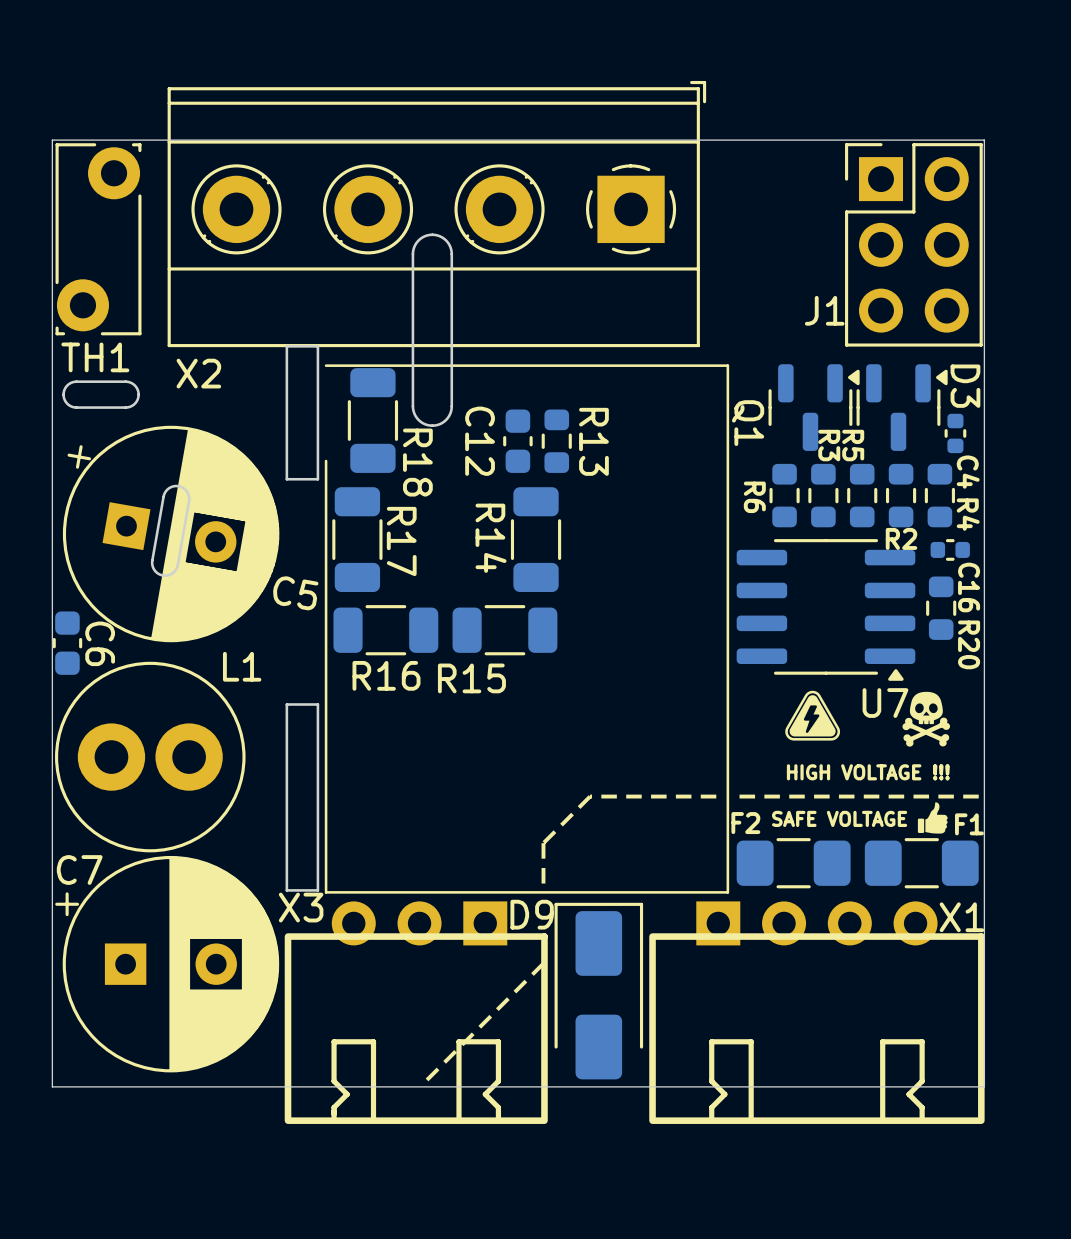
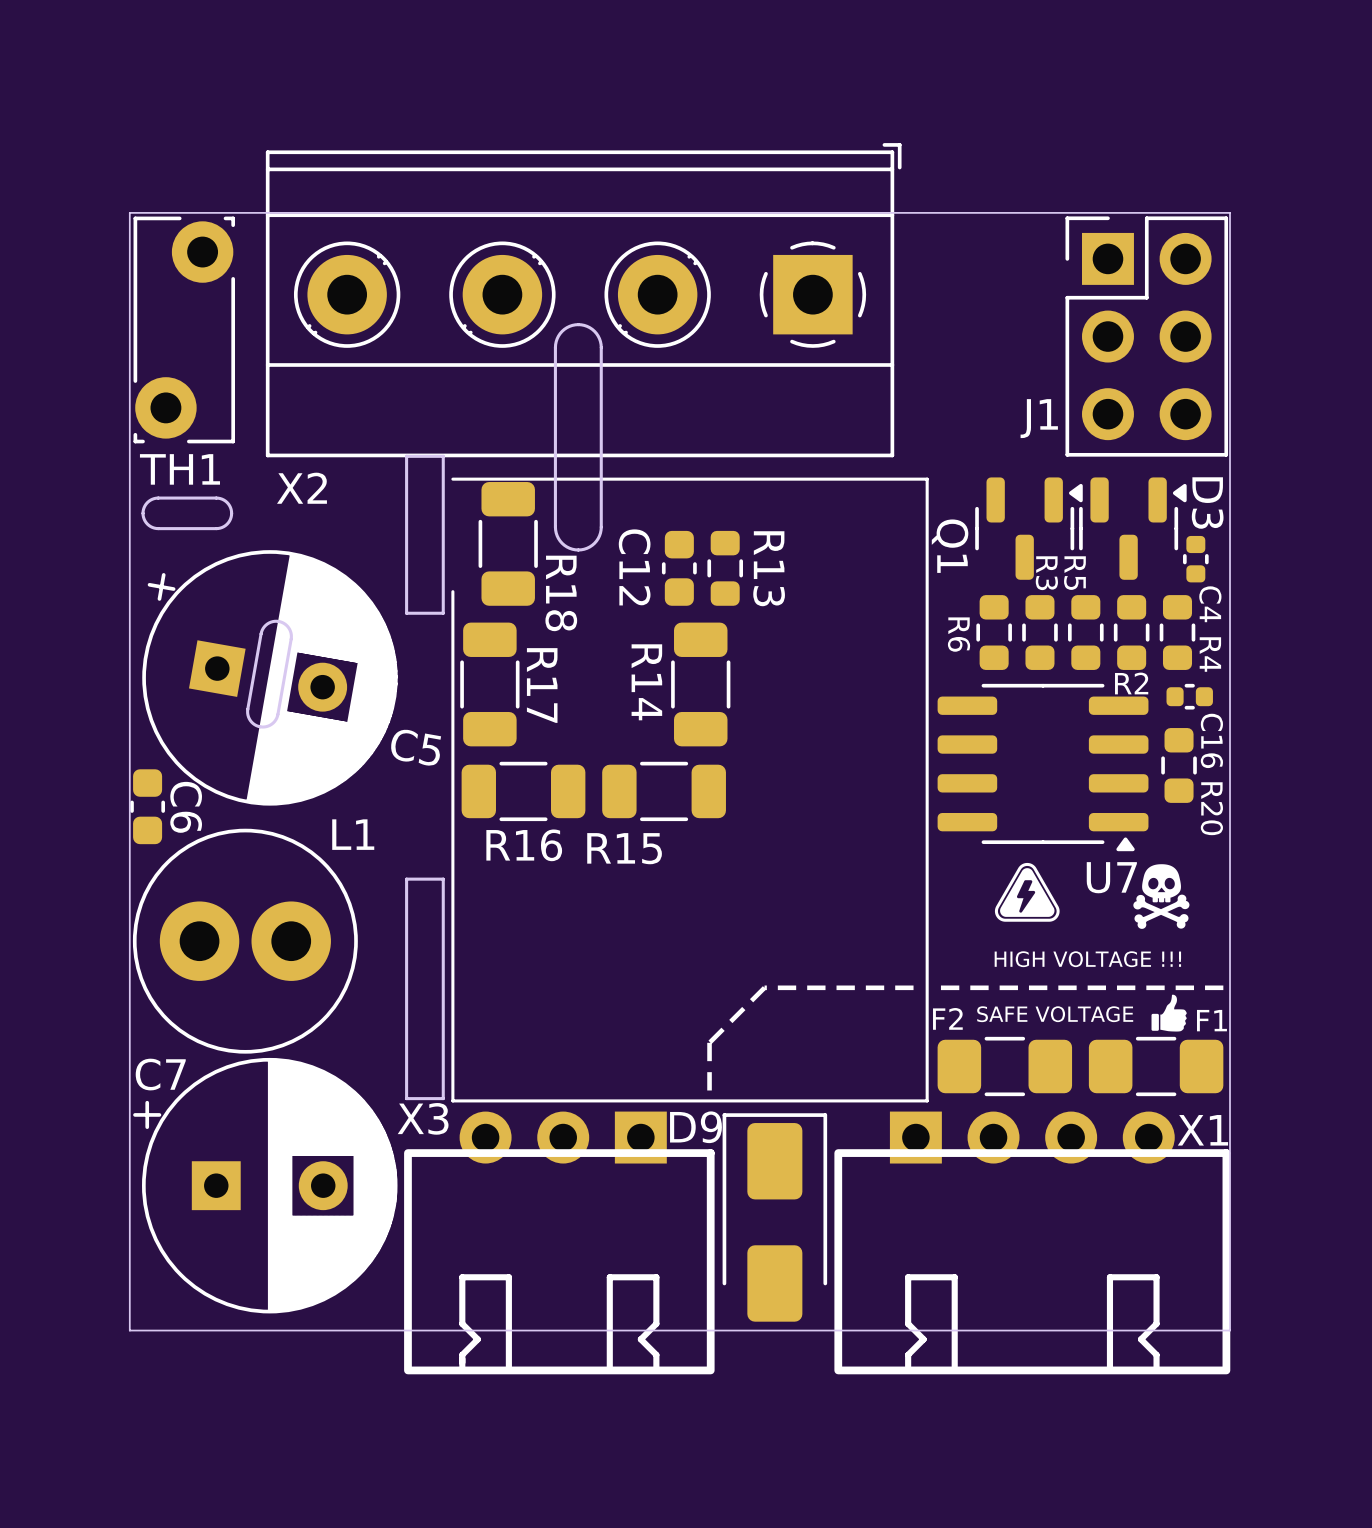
line: (543, 963) (425, 1081) -> none

